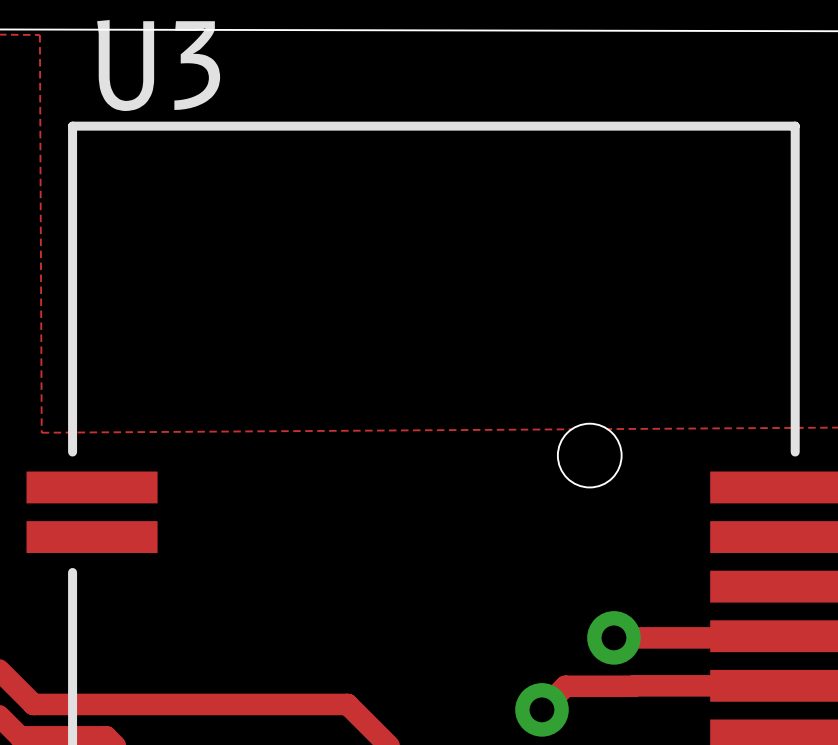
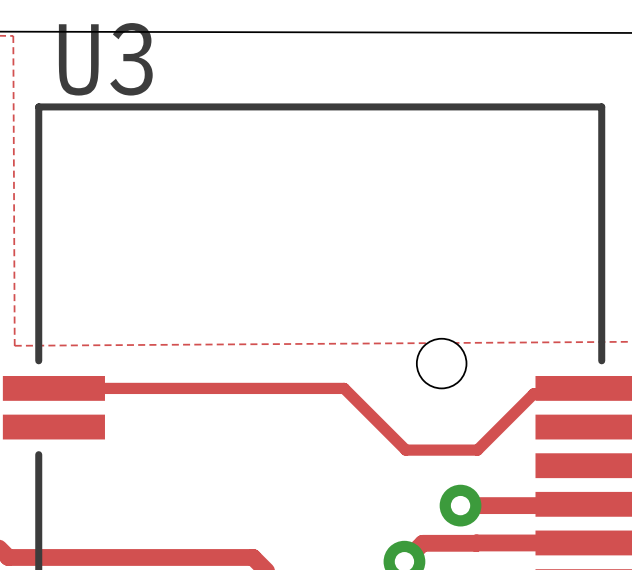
track: none -> (53, 388) (344, 388) (405, 450) (477, 450) (533, 393) (546, 393) (551, 388) (586, 388)

